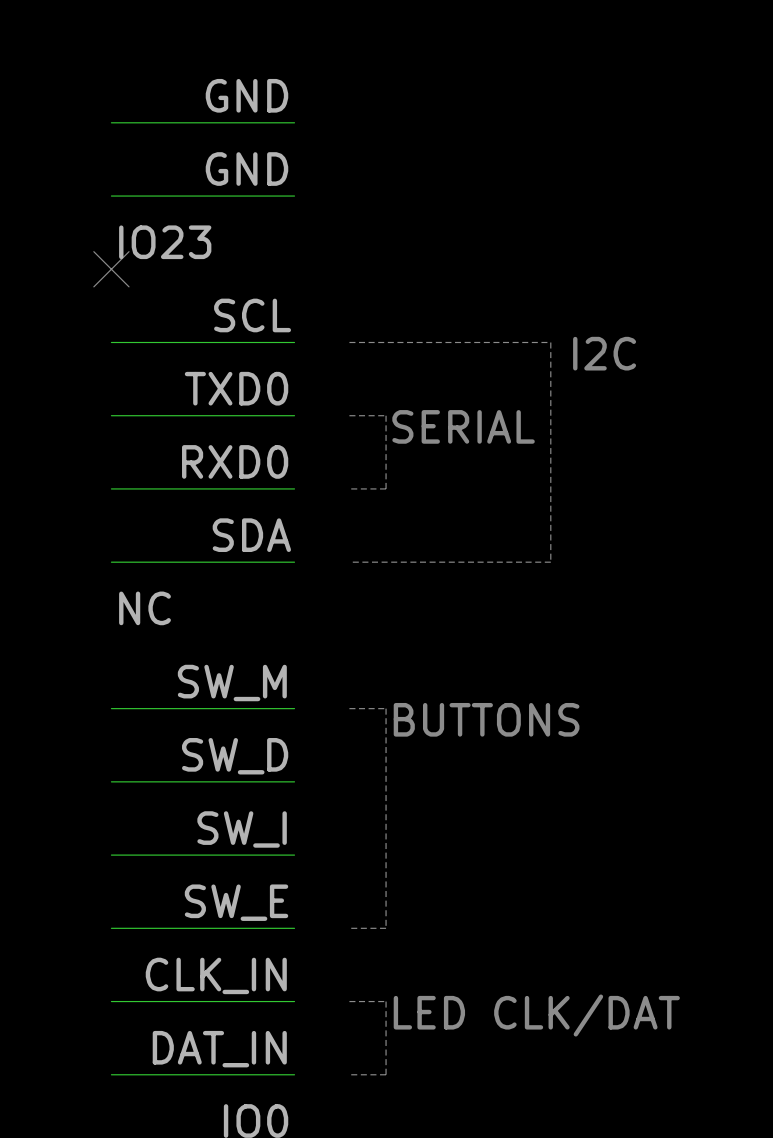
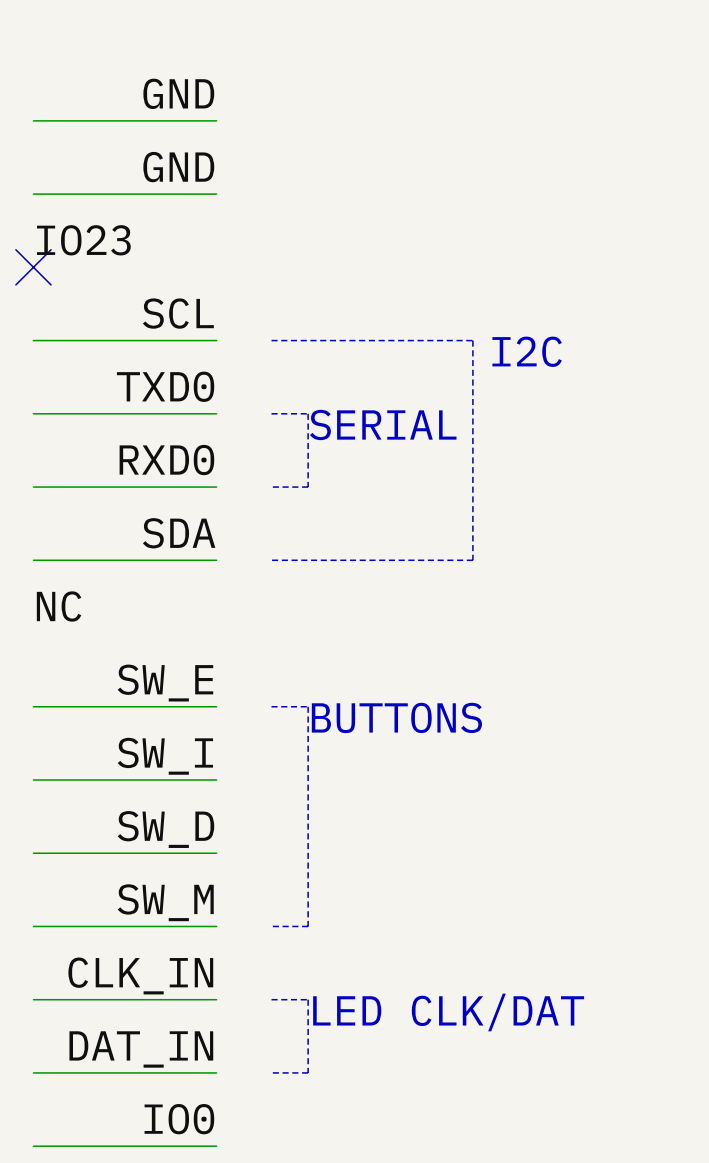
label: SW_M (232, 683) -> SW_E (165, 683)
label: SW_D (235, 756) -> SW_I (165, 756)
label: SW_I (242, 829) -> SW_D (165, 829)
label: SW_E (236, 902) -> SW_M (165, 902)

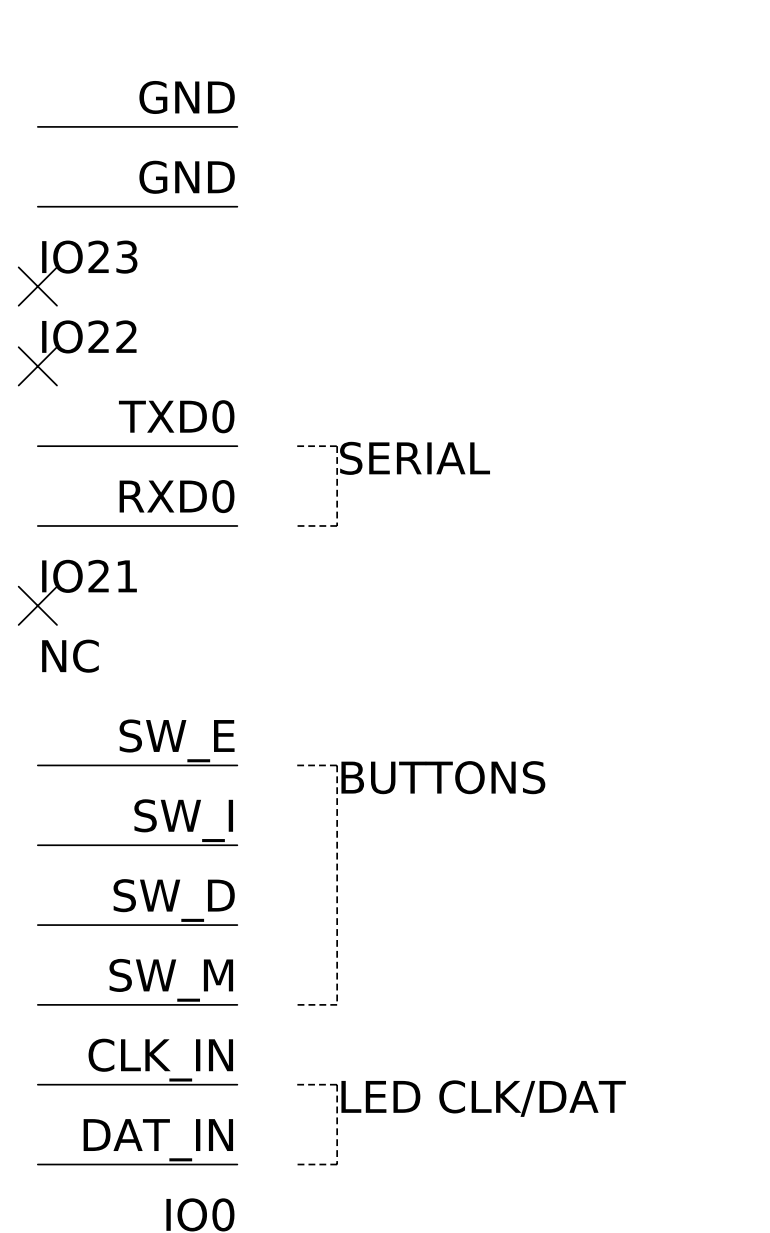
label: none -> IO22 (89, 336)
label: SCL (178, 313) -> none
wire: (33, 340) (216, 340) -> none
no-connect mark: none -> (37, 366)
line: (271, 340) (472, 340) (472, 560) (271, 560) -> none
text: I2C (527, 351) -> none
label: none -> IO21 (89, 576)
label: SDA (179, 533) -> none
wire: (33, 560) (216, 560) -> none
no-connect mark: none -> (37, 605)

